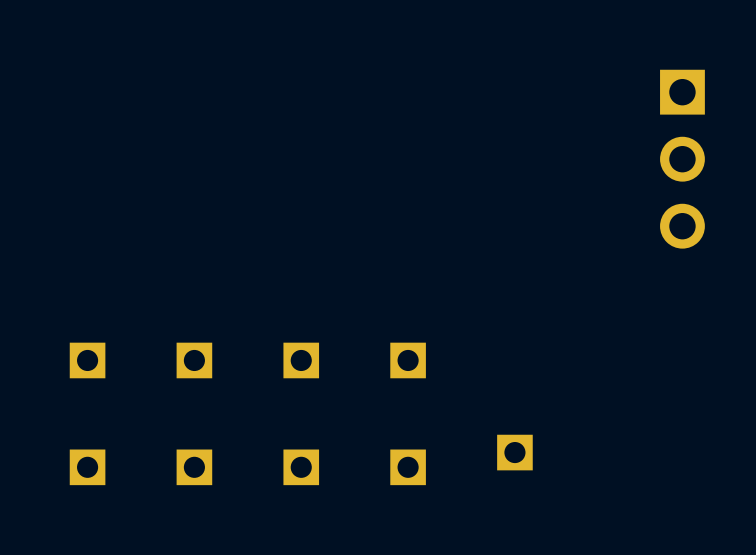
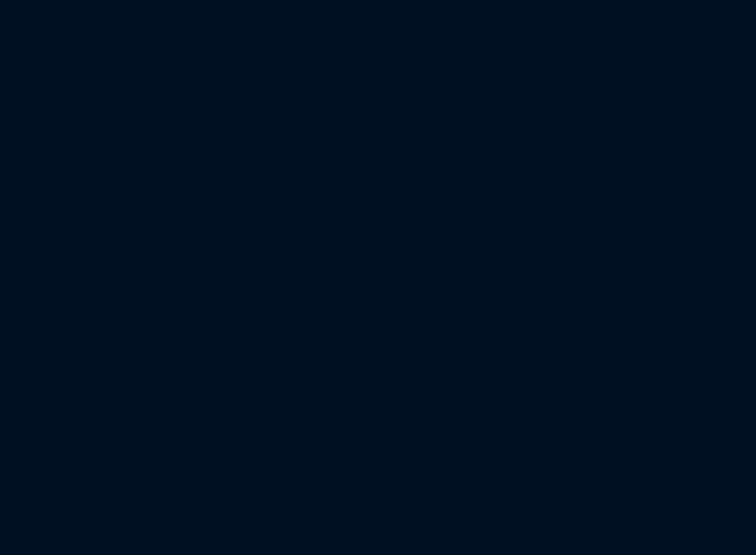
part: (682, 159) -> none
part: (87, 360) -> none
part: (194, 360) -> none
part: (301, 360) -> none
part: (408, 360) -> none
part: (514, 452) -> none
part: (87, 467) -> none
part: (194, 467) -> none
part: (301, 467) -> none
part: (408, 467) -> none

